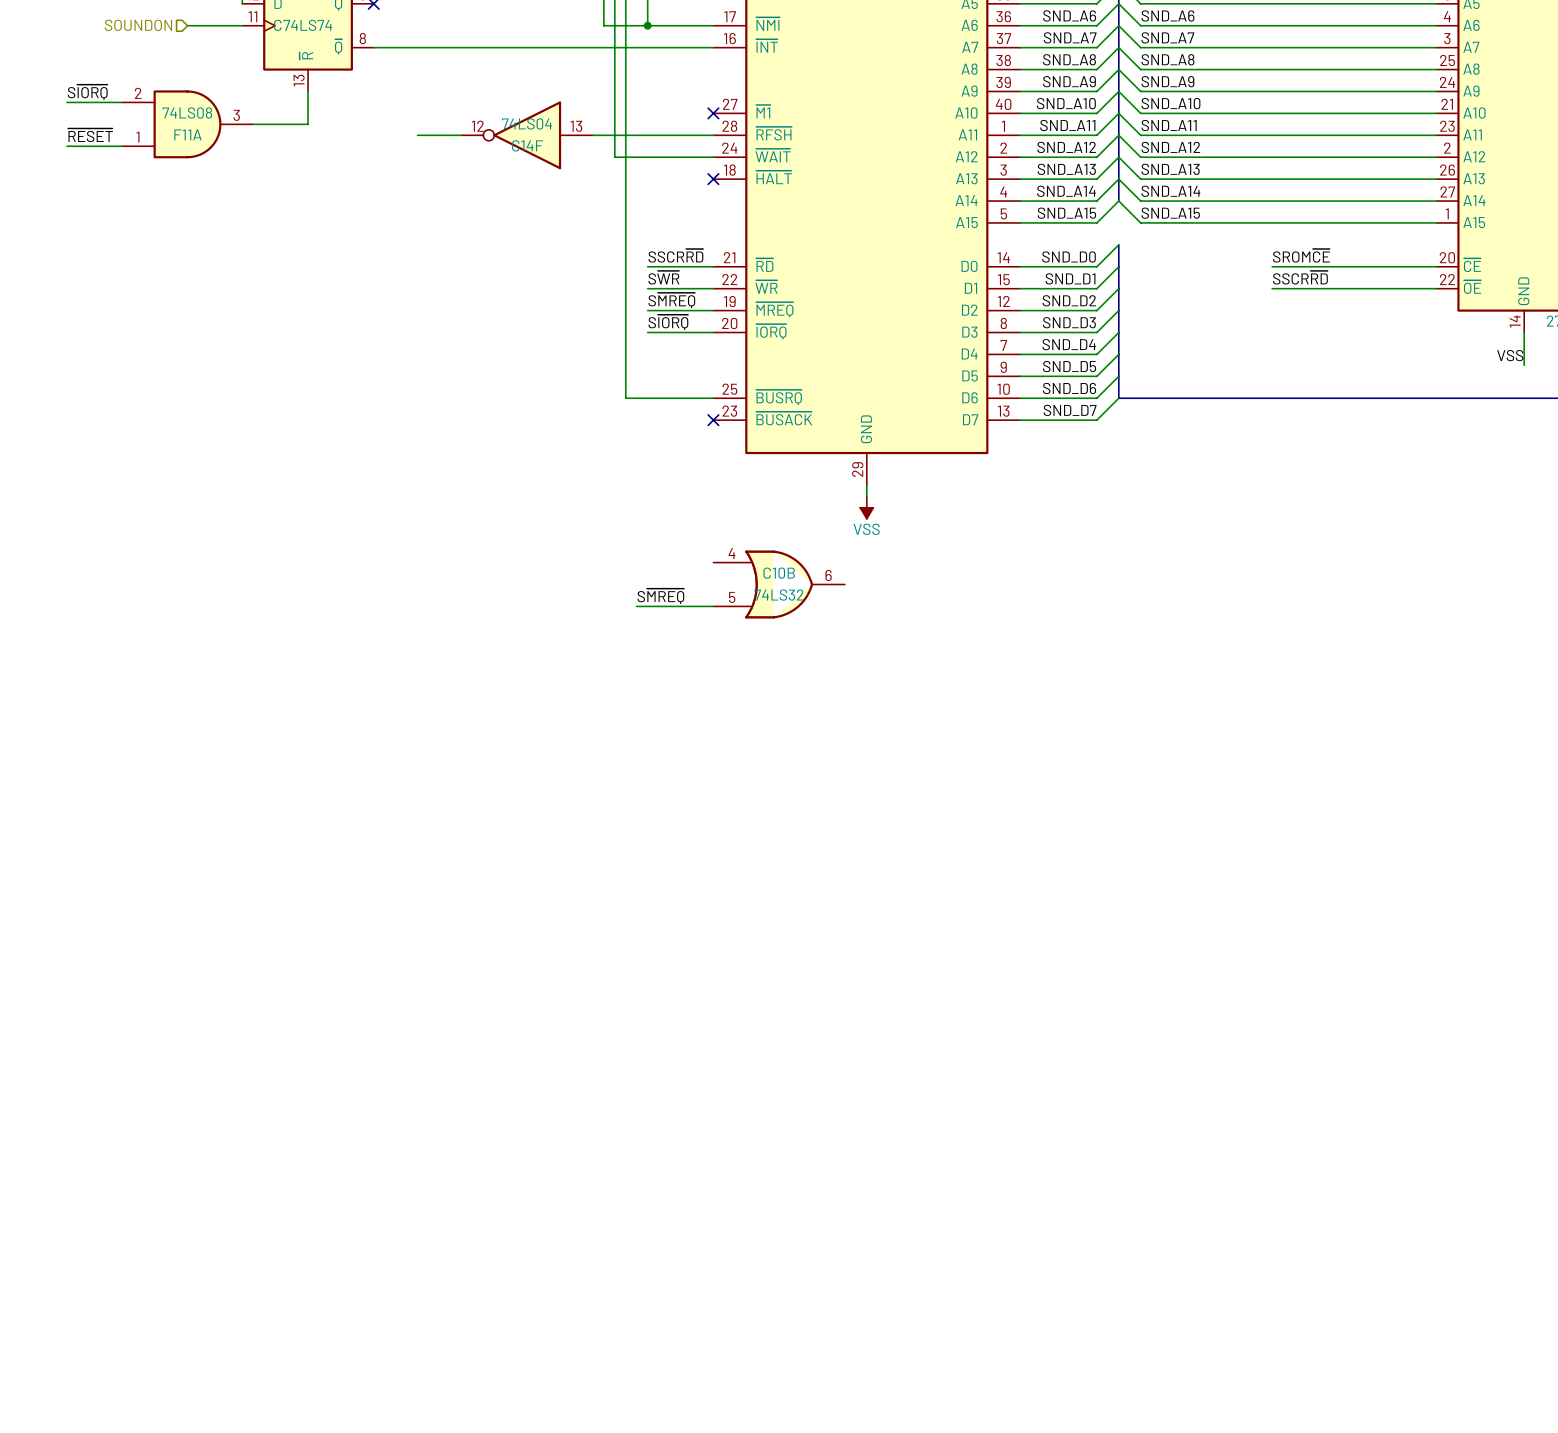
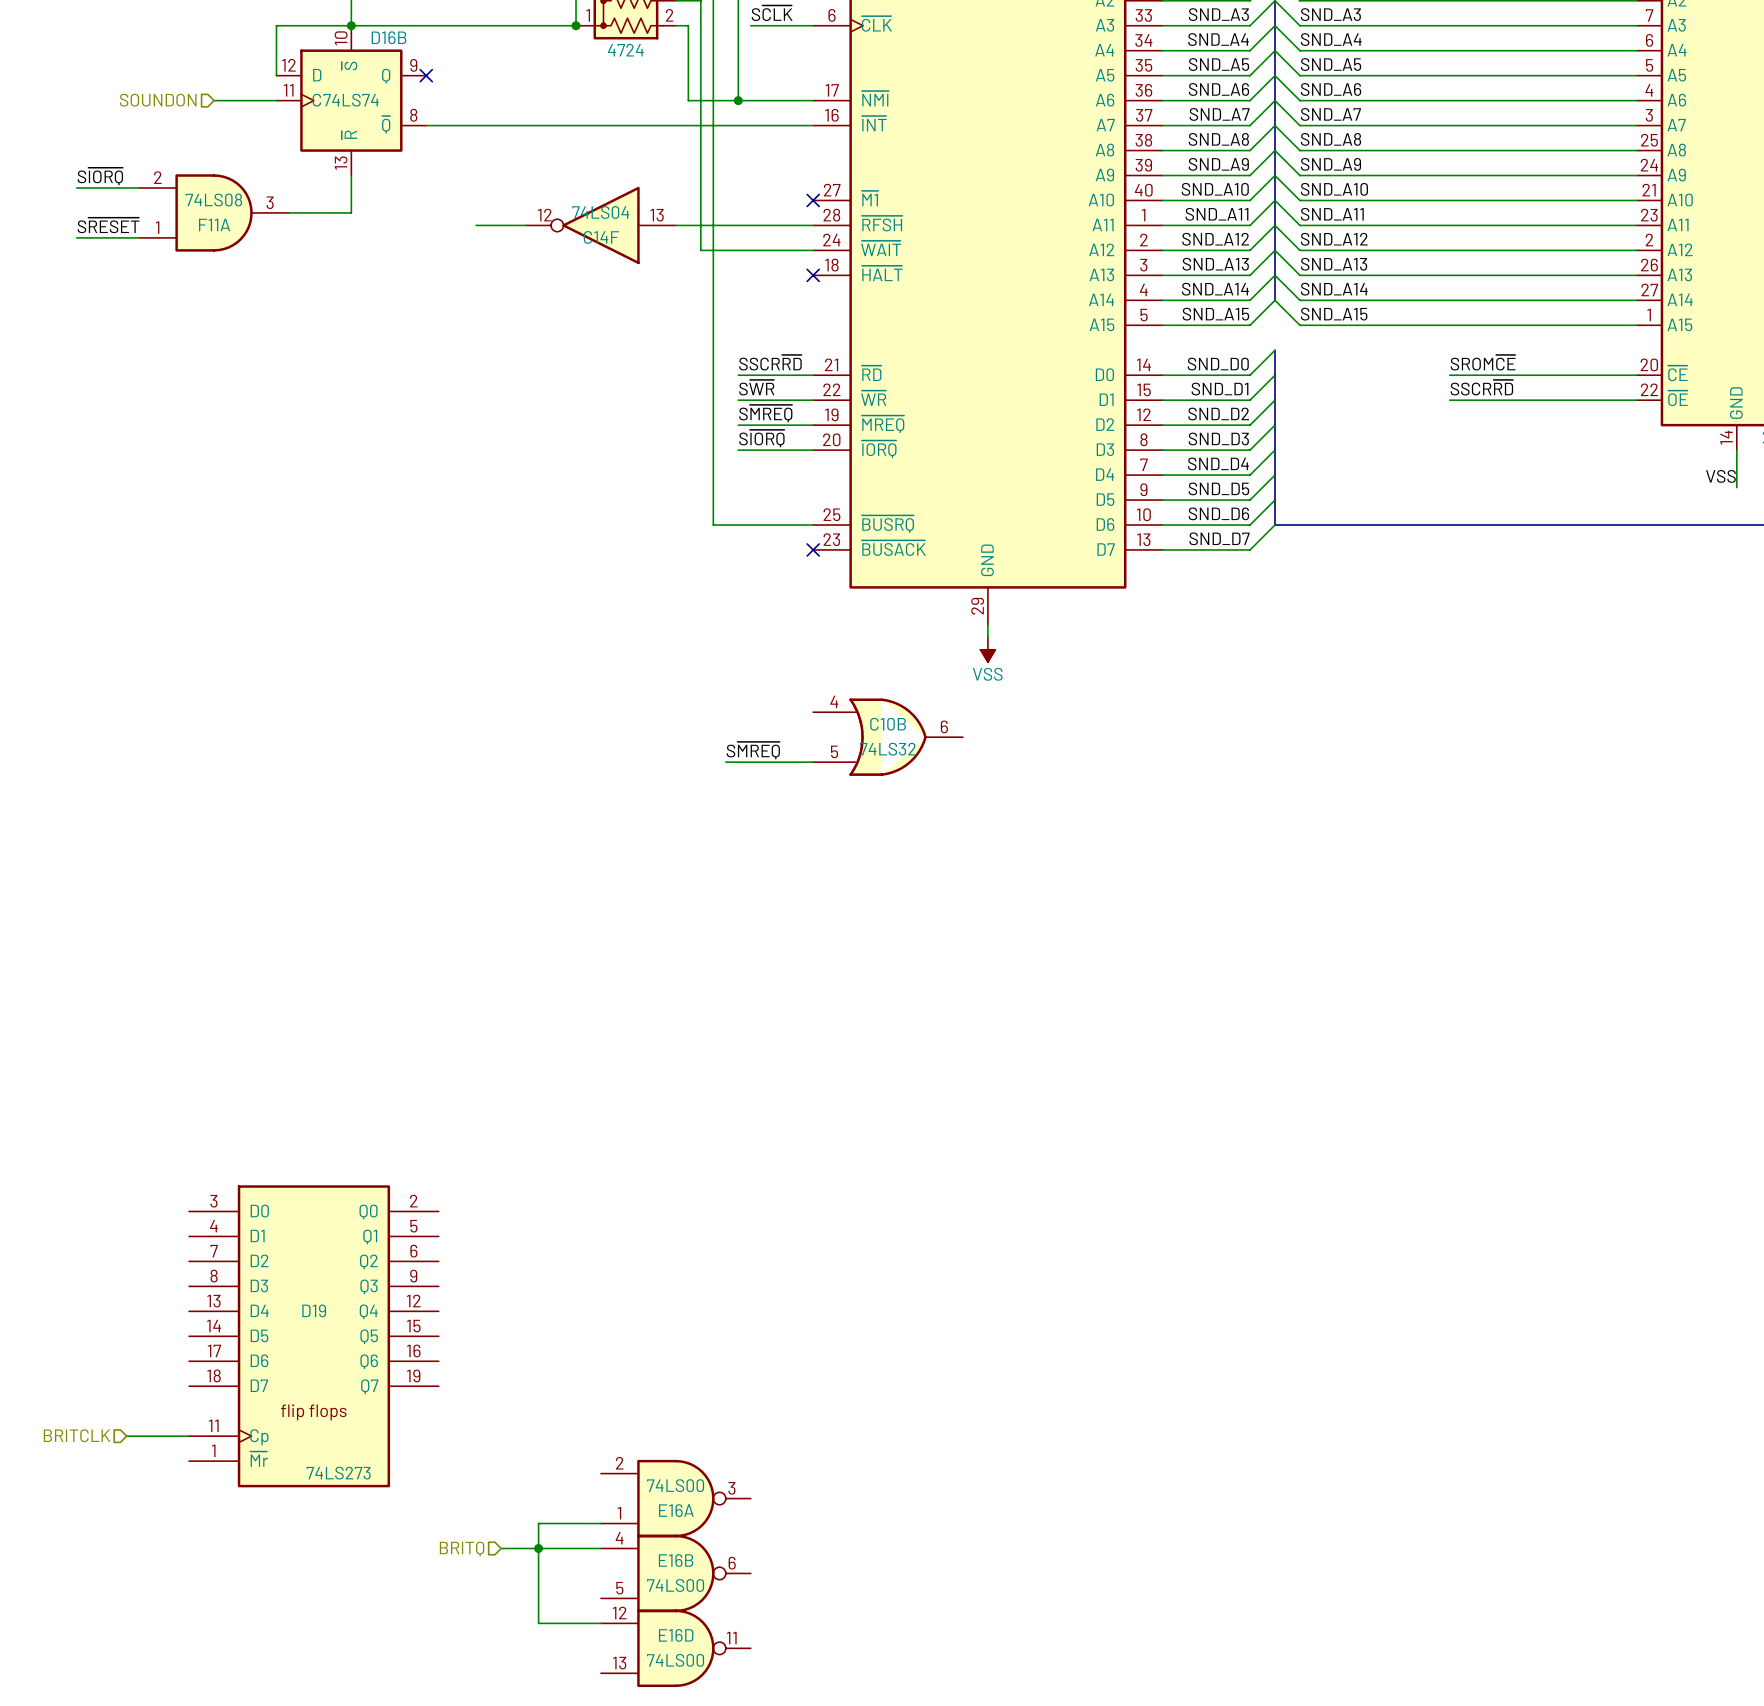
label: ~{RESET} (90, 135) -> S~{RESET} (108, 225)
D19: none -> 74LS273 (313, 1336)
hierarchical label: none -> BRITCLK (77, 1435)
wire: none -> (126, 1436) (189, 1436)
E16A: none -> 74LS00 (675, 1498)
wire: none -> (600, 1523) (538, 1523) (538, 1623) (600, 1623)
wire: none -> (501, 1548) (600, 1548)
junction: none -> (538, 1548)
hierarchical label: none -> BRITQ (462, 1548)
E16B: none -> 74LS00 (675, 1573)
E16D: none -> 74LS00 (675, 1648)

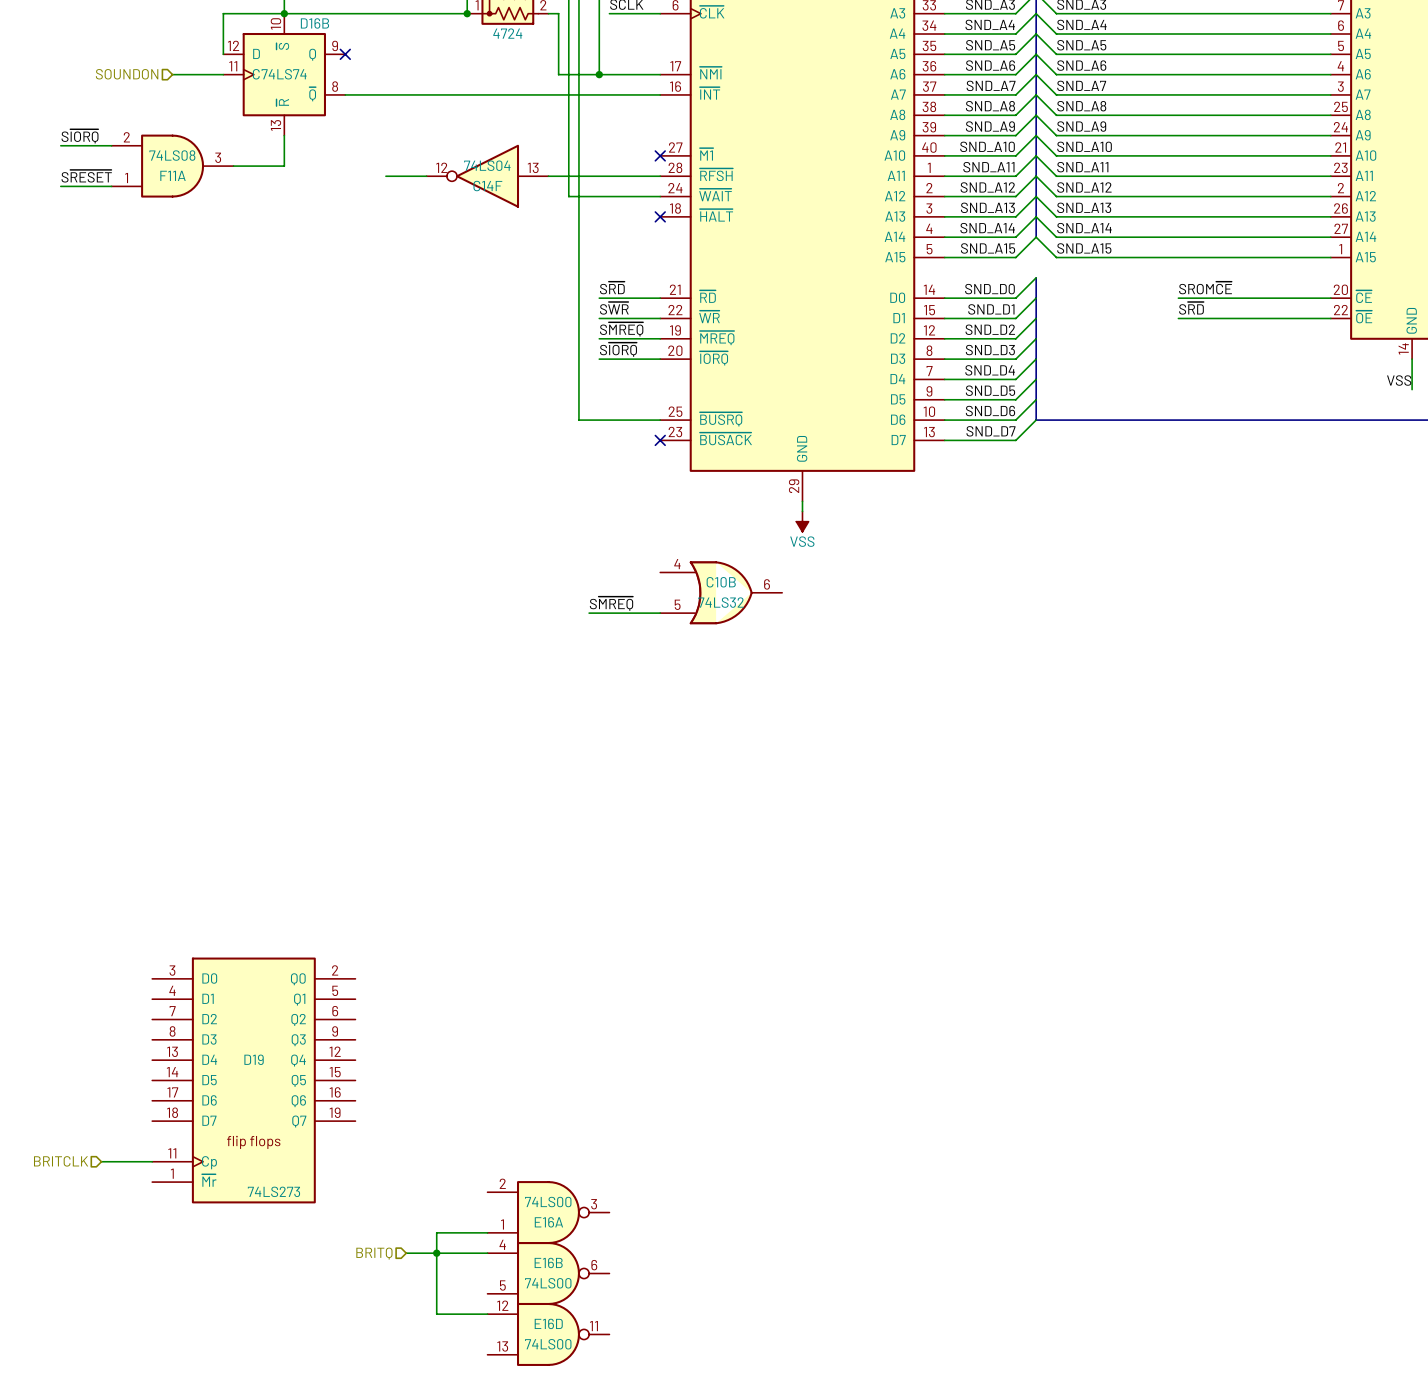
label: SSCR~{RD} (770, 362) -> S~{RD} (612, 287)
label: SSCR~{RD} (1481, 387) -> S~{RD} (1191, 308)

